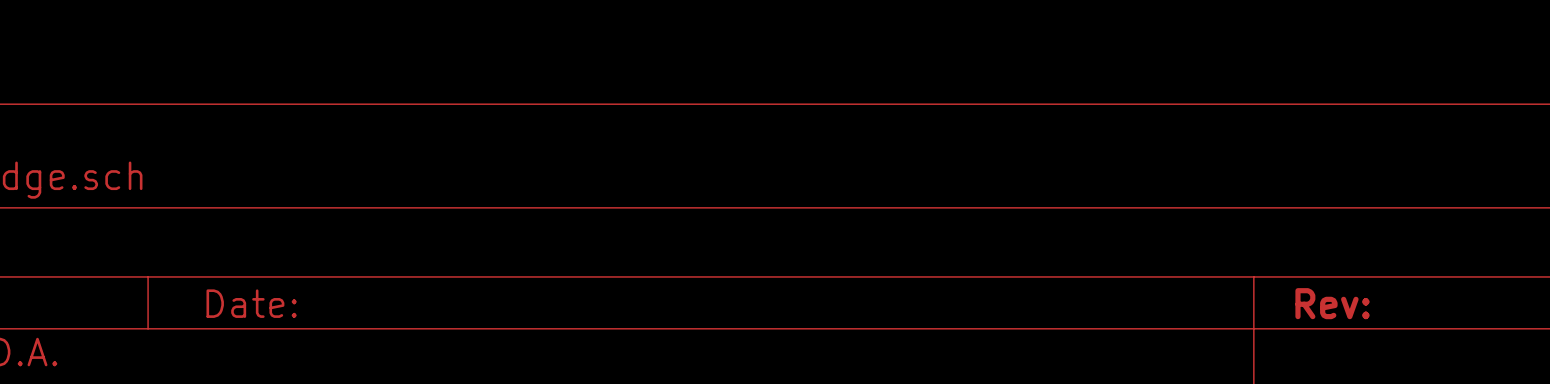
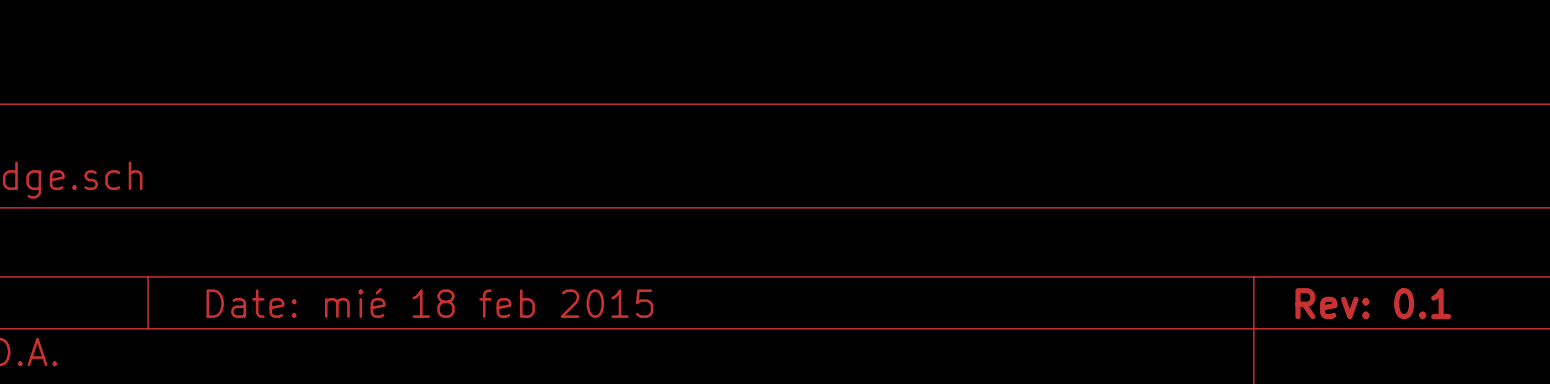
title block: Date: (251, 303) -> Date: mié 18 feb 2015 (429, 303)
title block: Rev: (1332, 303) -> Rev: 0.1 (1373, 303)

